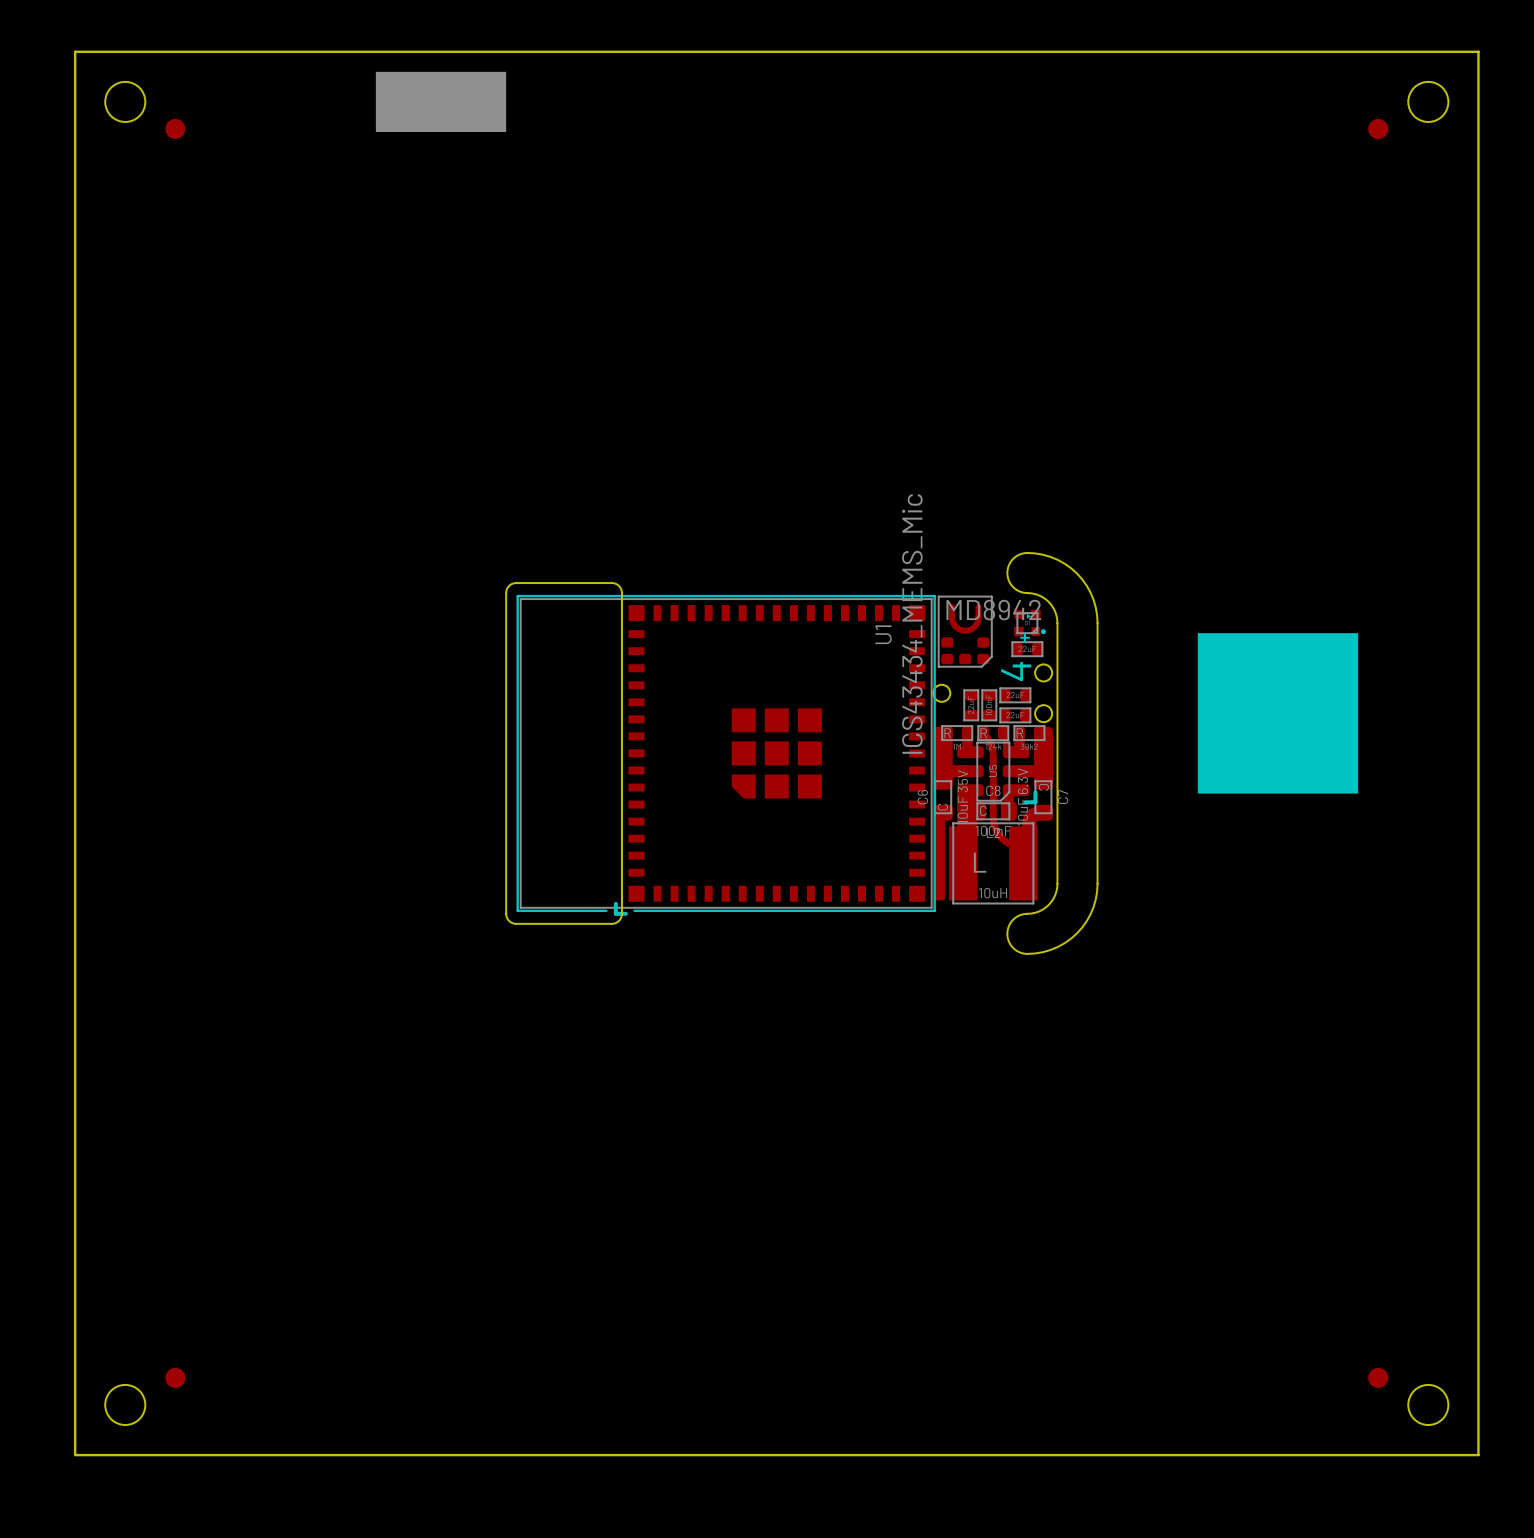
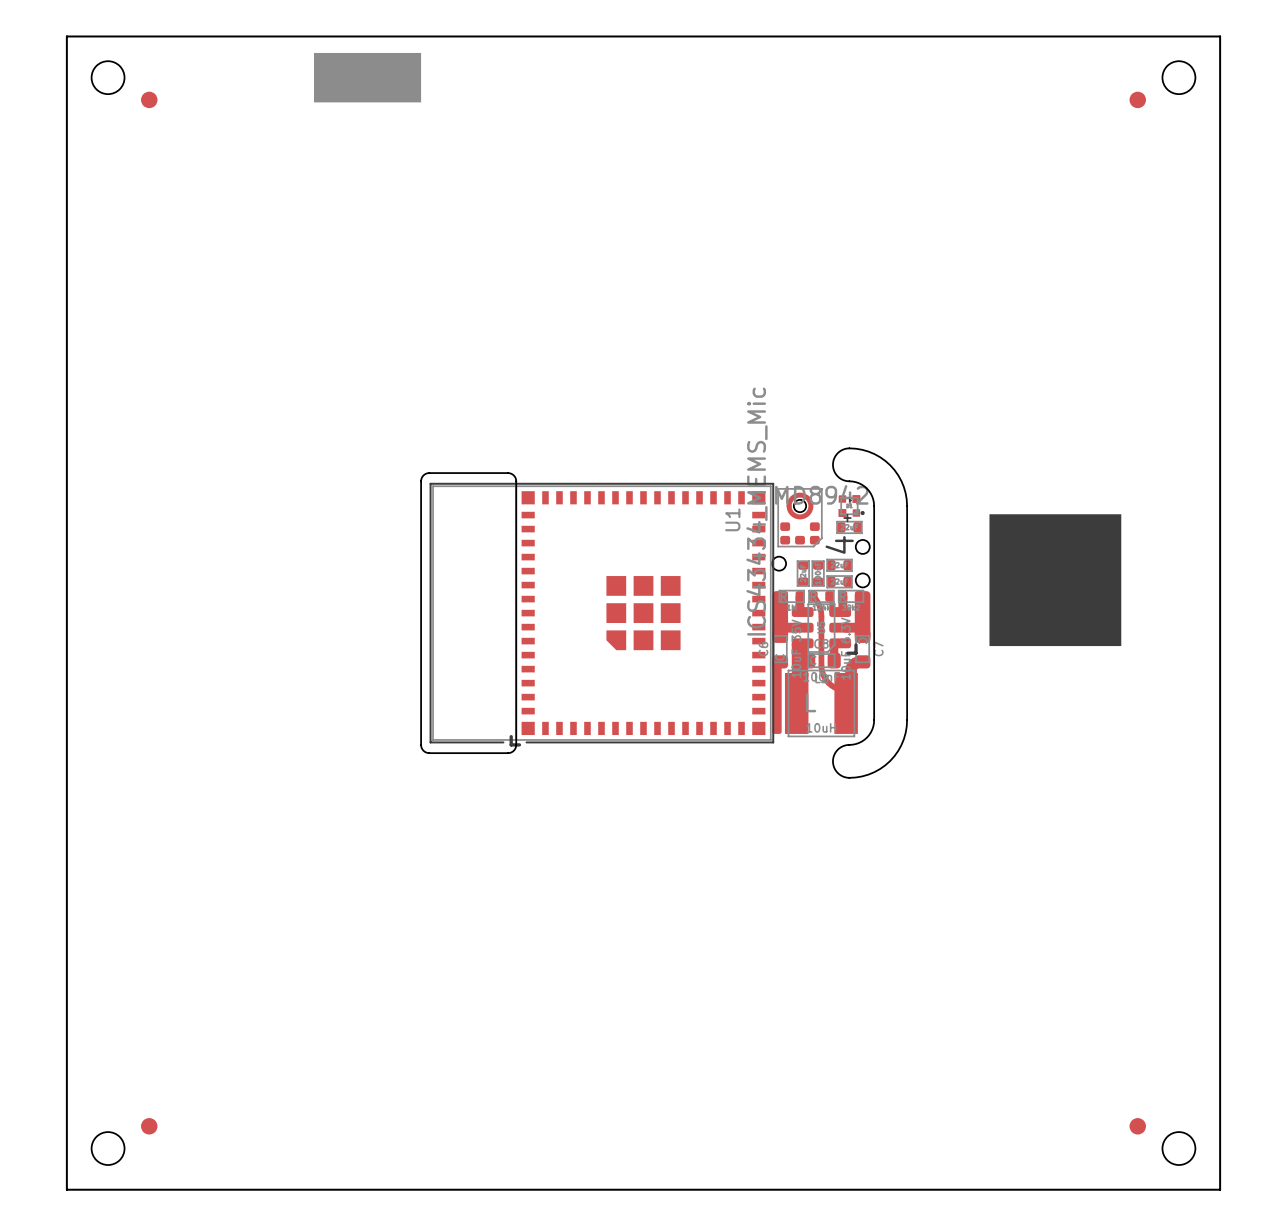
U1 footprint: [937, 574, 993, 668] -> [777, 488, 823, 548]

